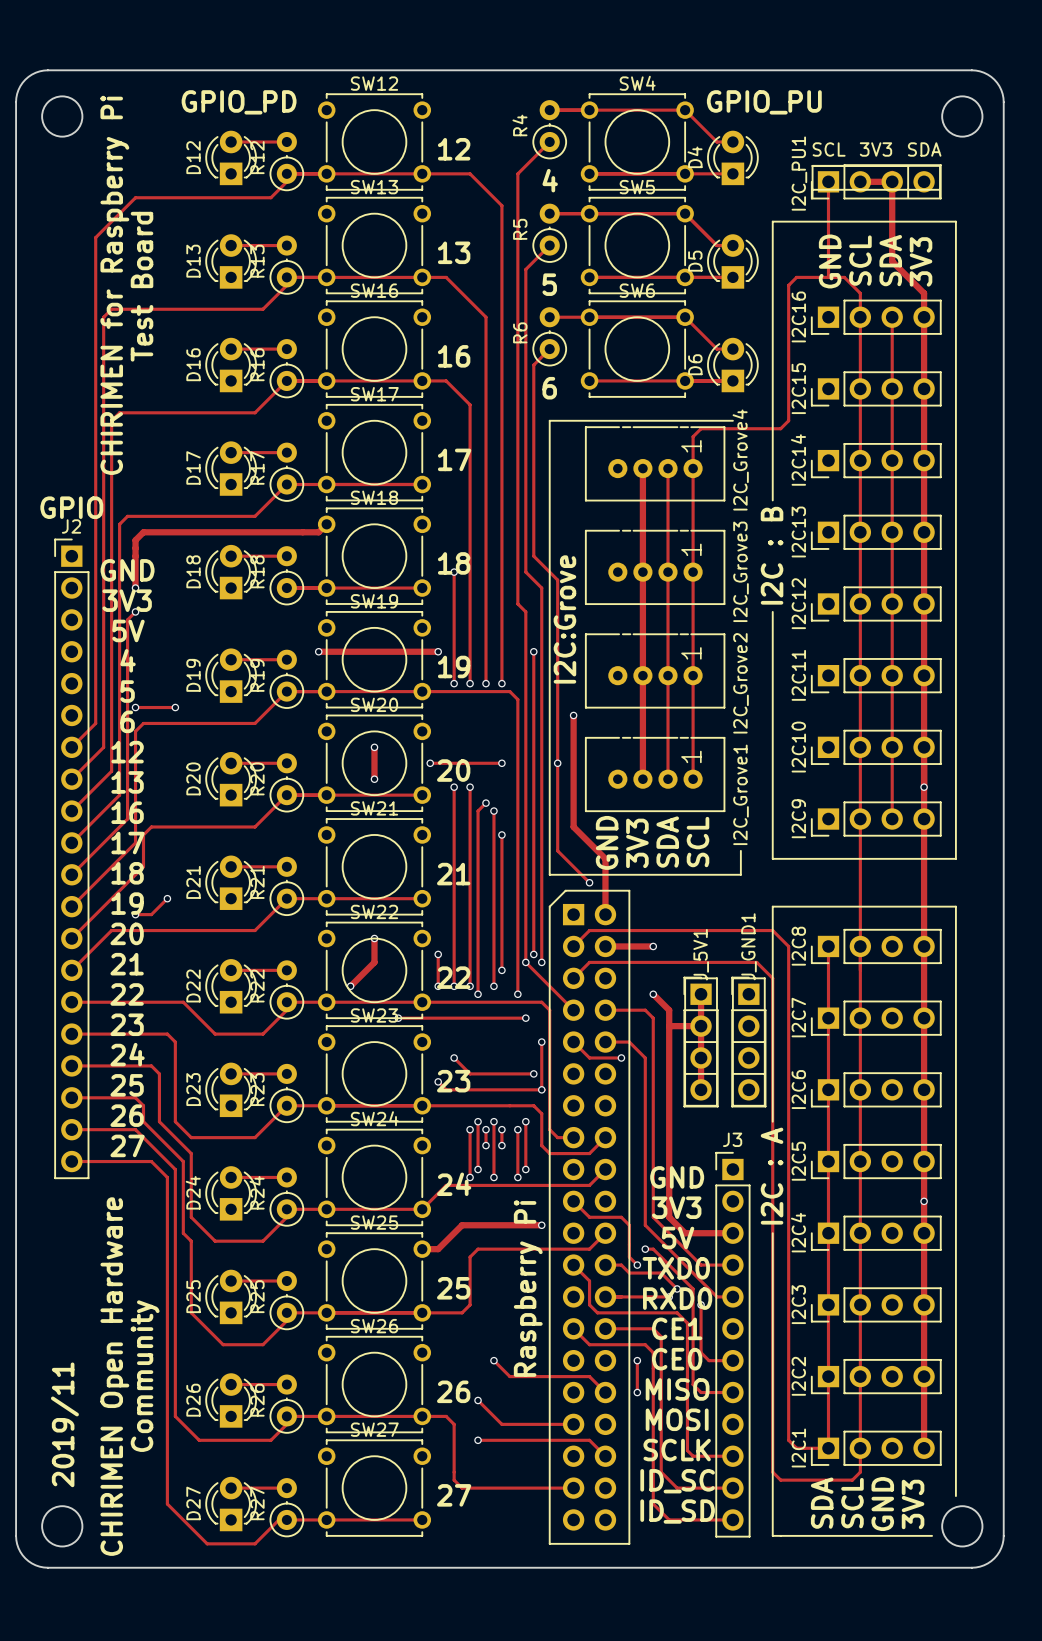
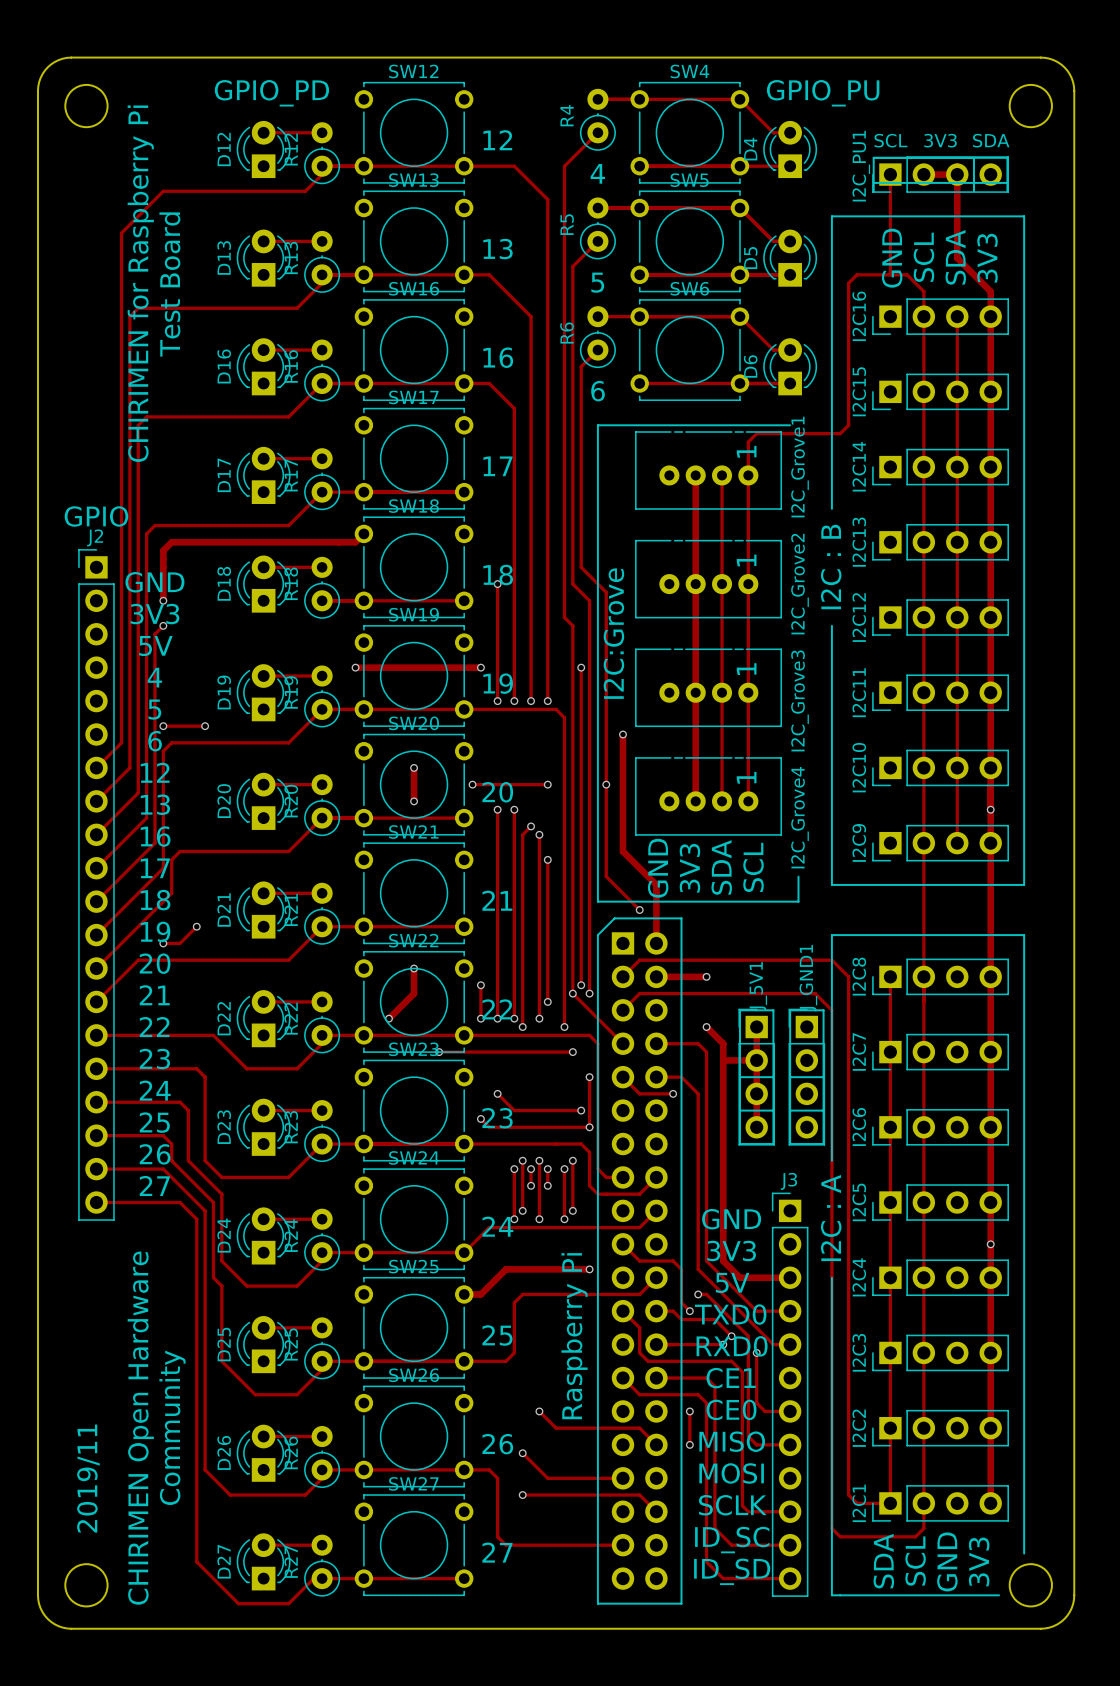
I2C_Grove4 name: I2C_Grove4 (740, 460) -> I2C_Grove1 (800, 467)
I2C_Grove3 name: I2C_Grove3 (741, 571) -> I2C_Grove2 (800, 584)
I2C_Grove2 name: I2C_Grove2 (741, 683) -> I2C_Grove3 (800, 700)
I2C_Grove1 name: I2C_Grove1 (741, 794) -> I2C_Grove4 (800, 817)

